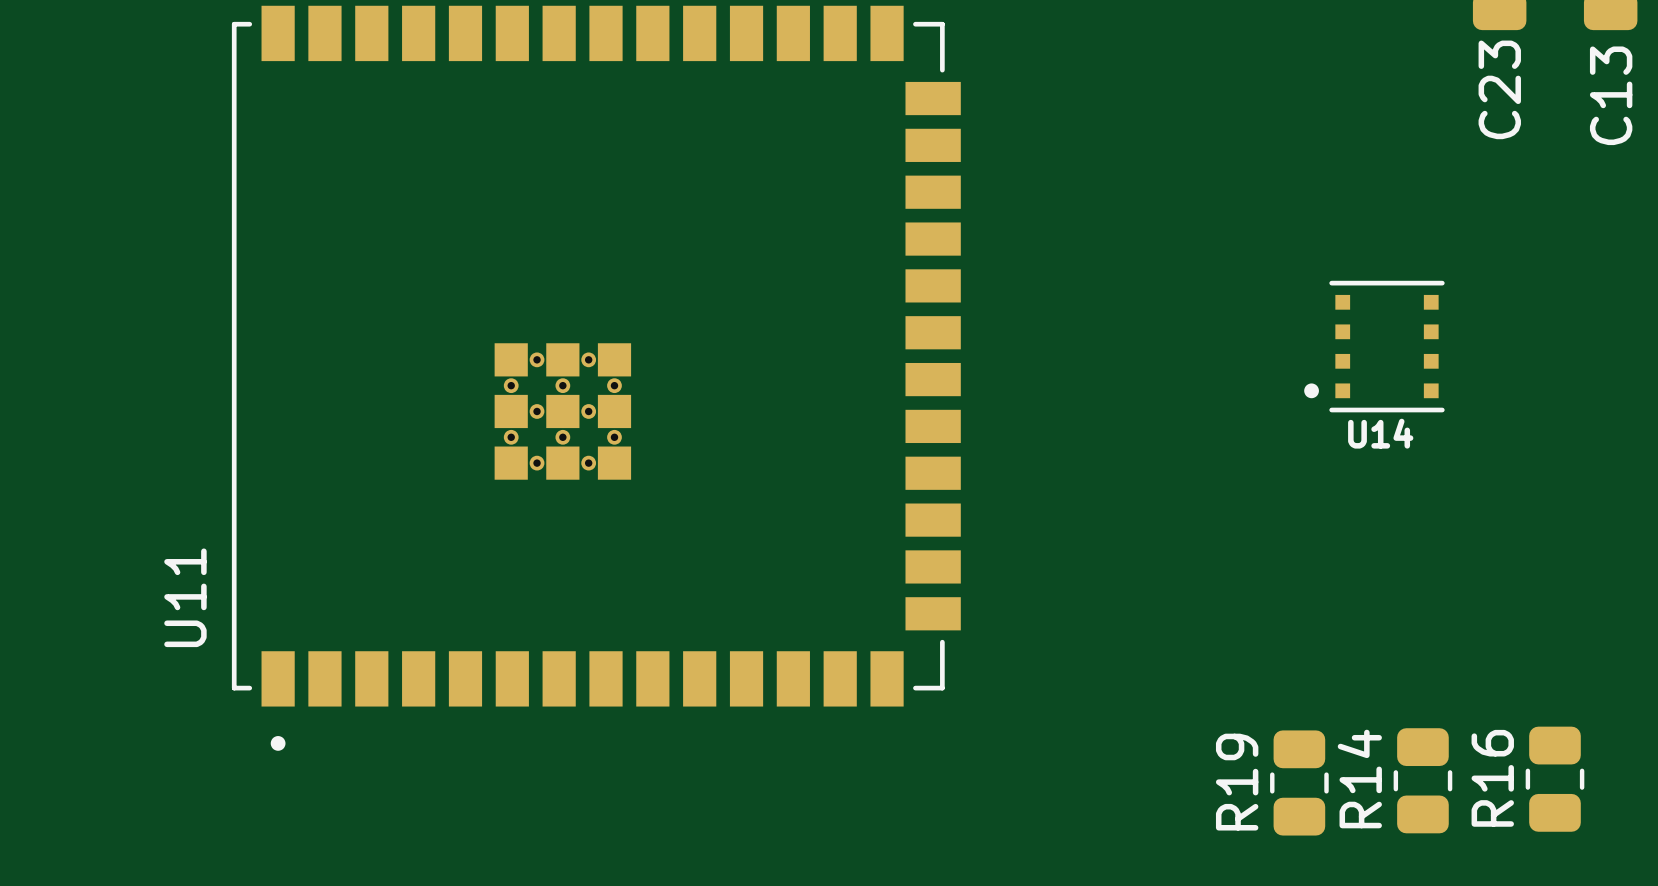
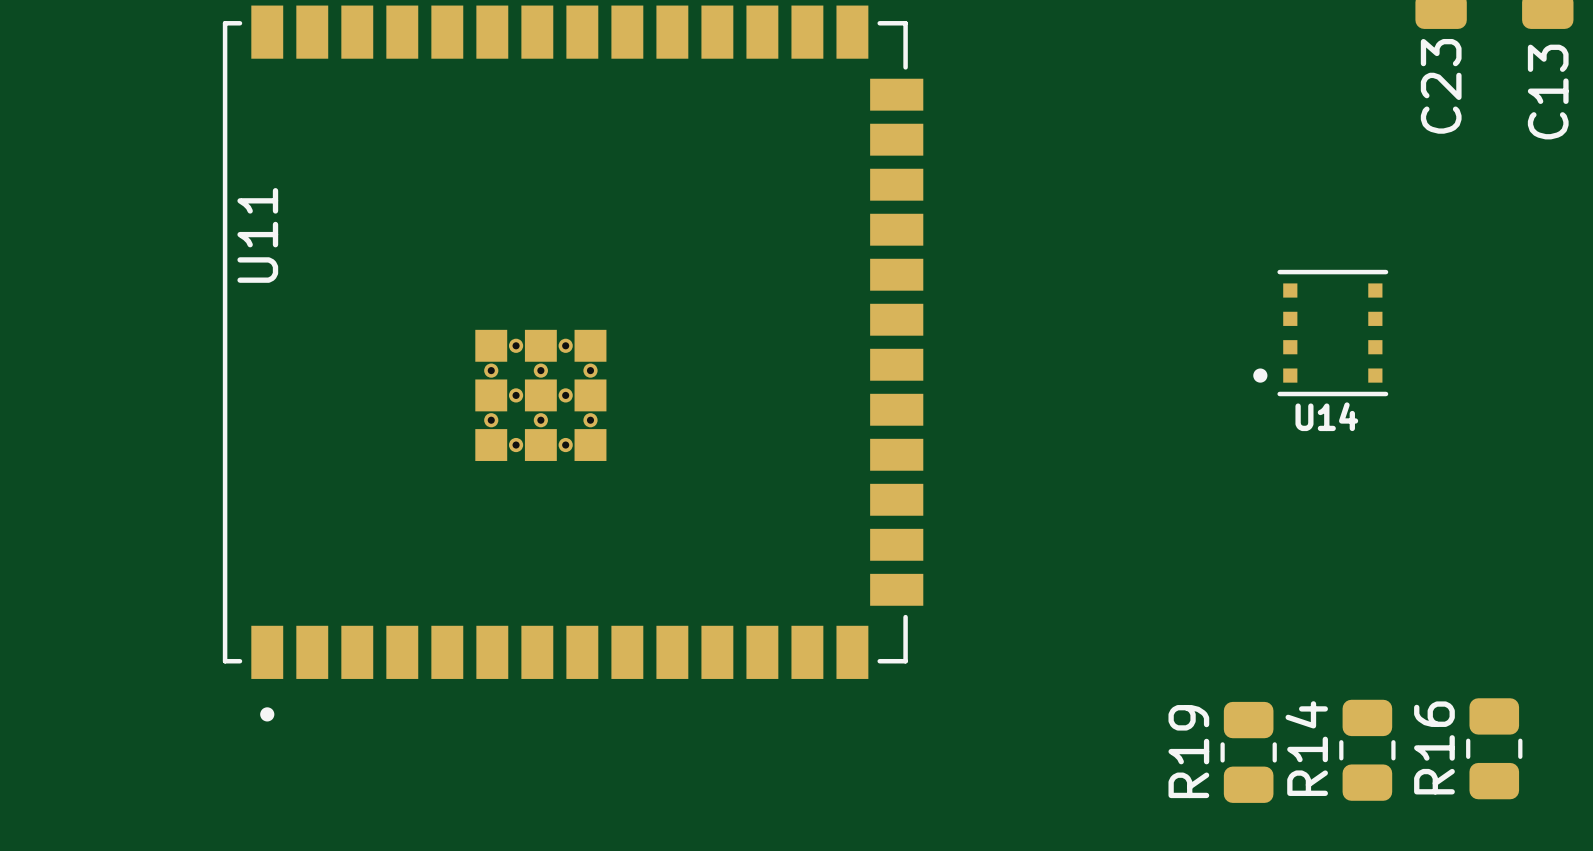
U11 name position: U11 (185, 597) -> U11 (257, 235)

